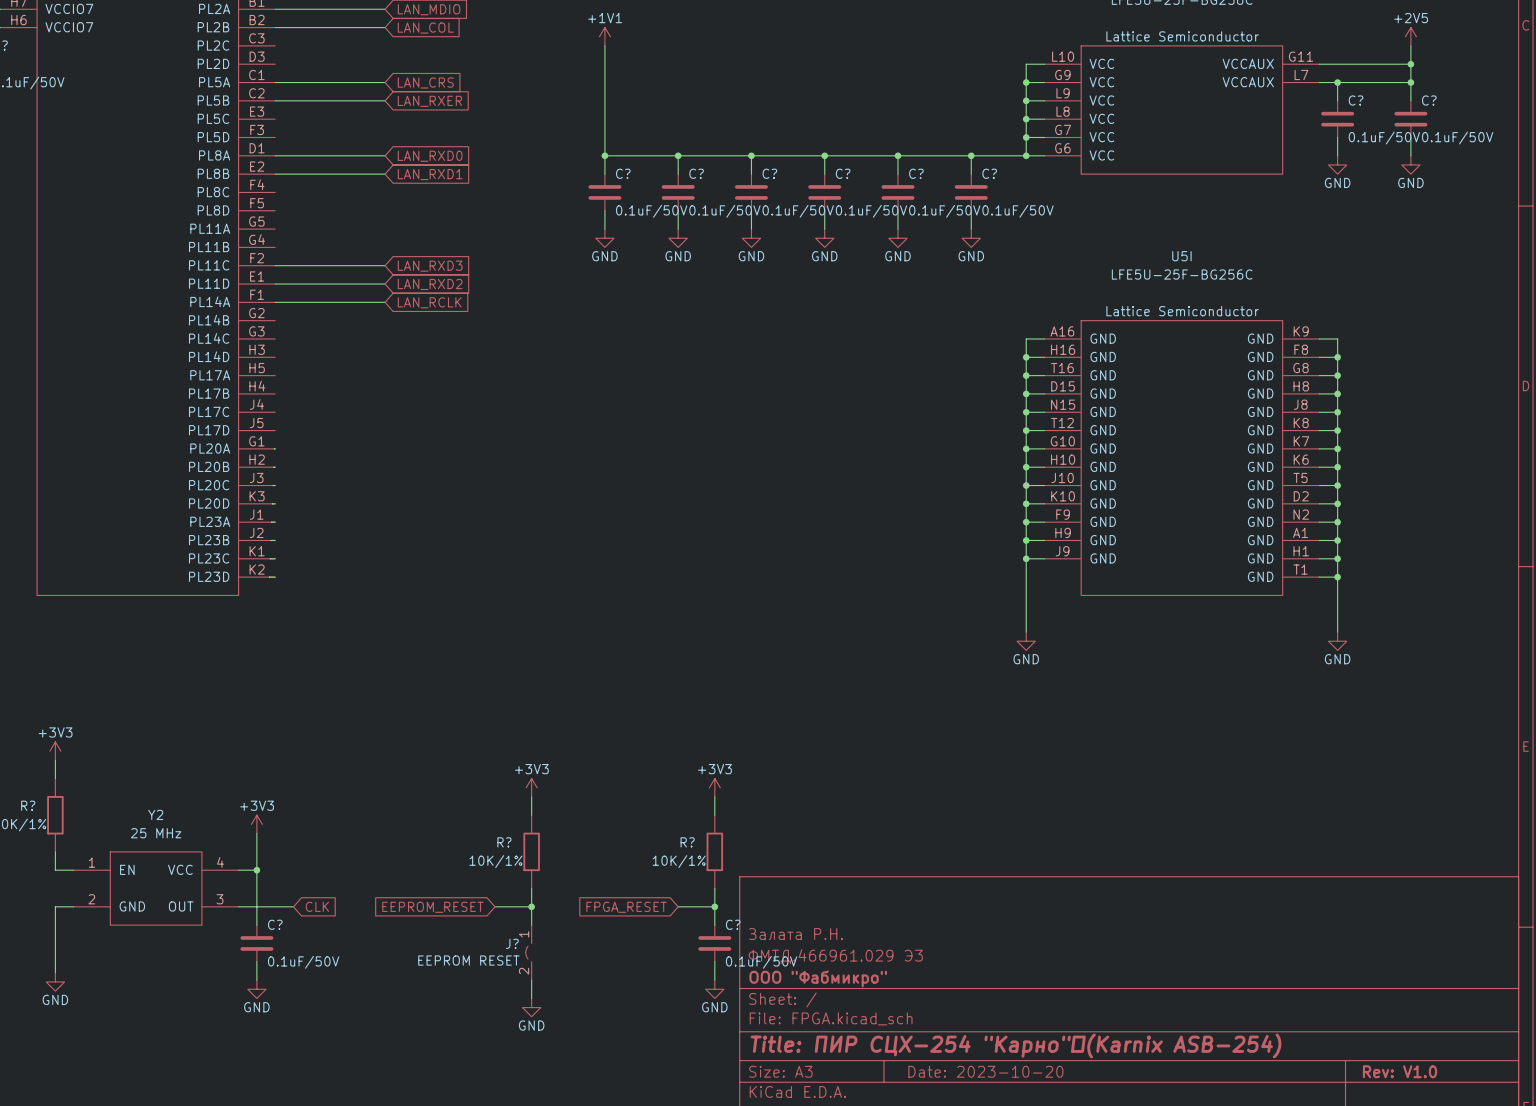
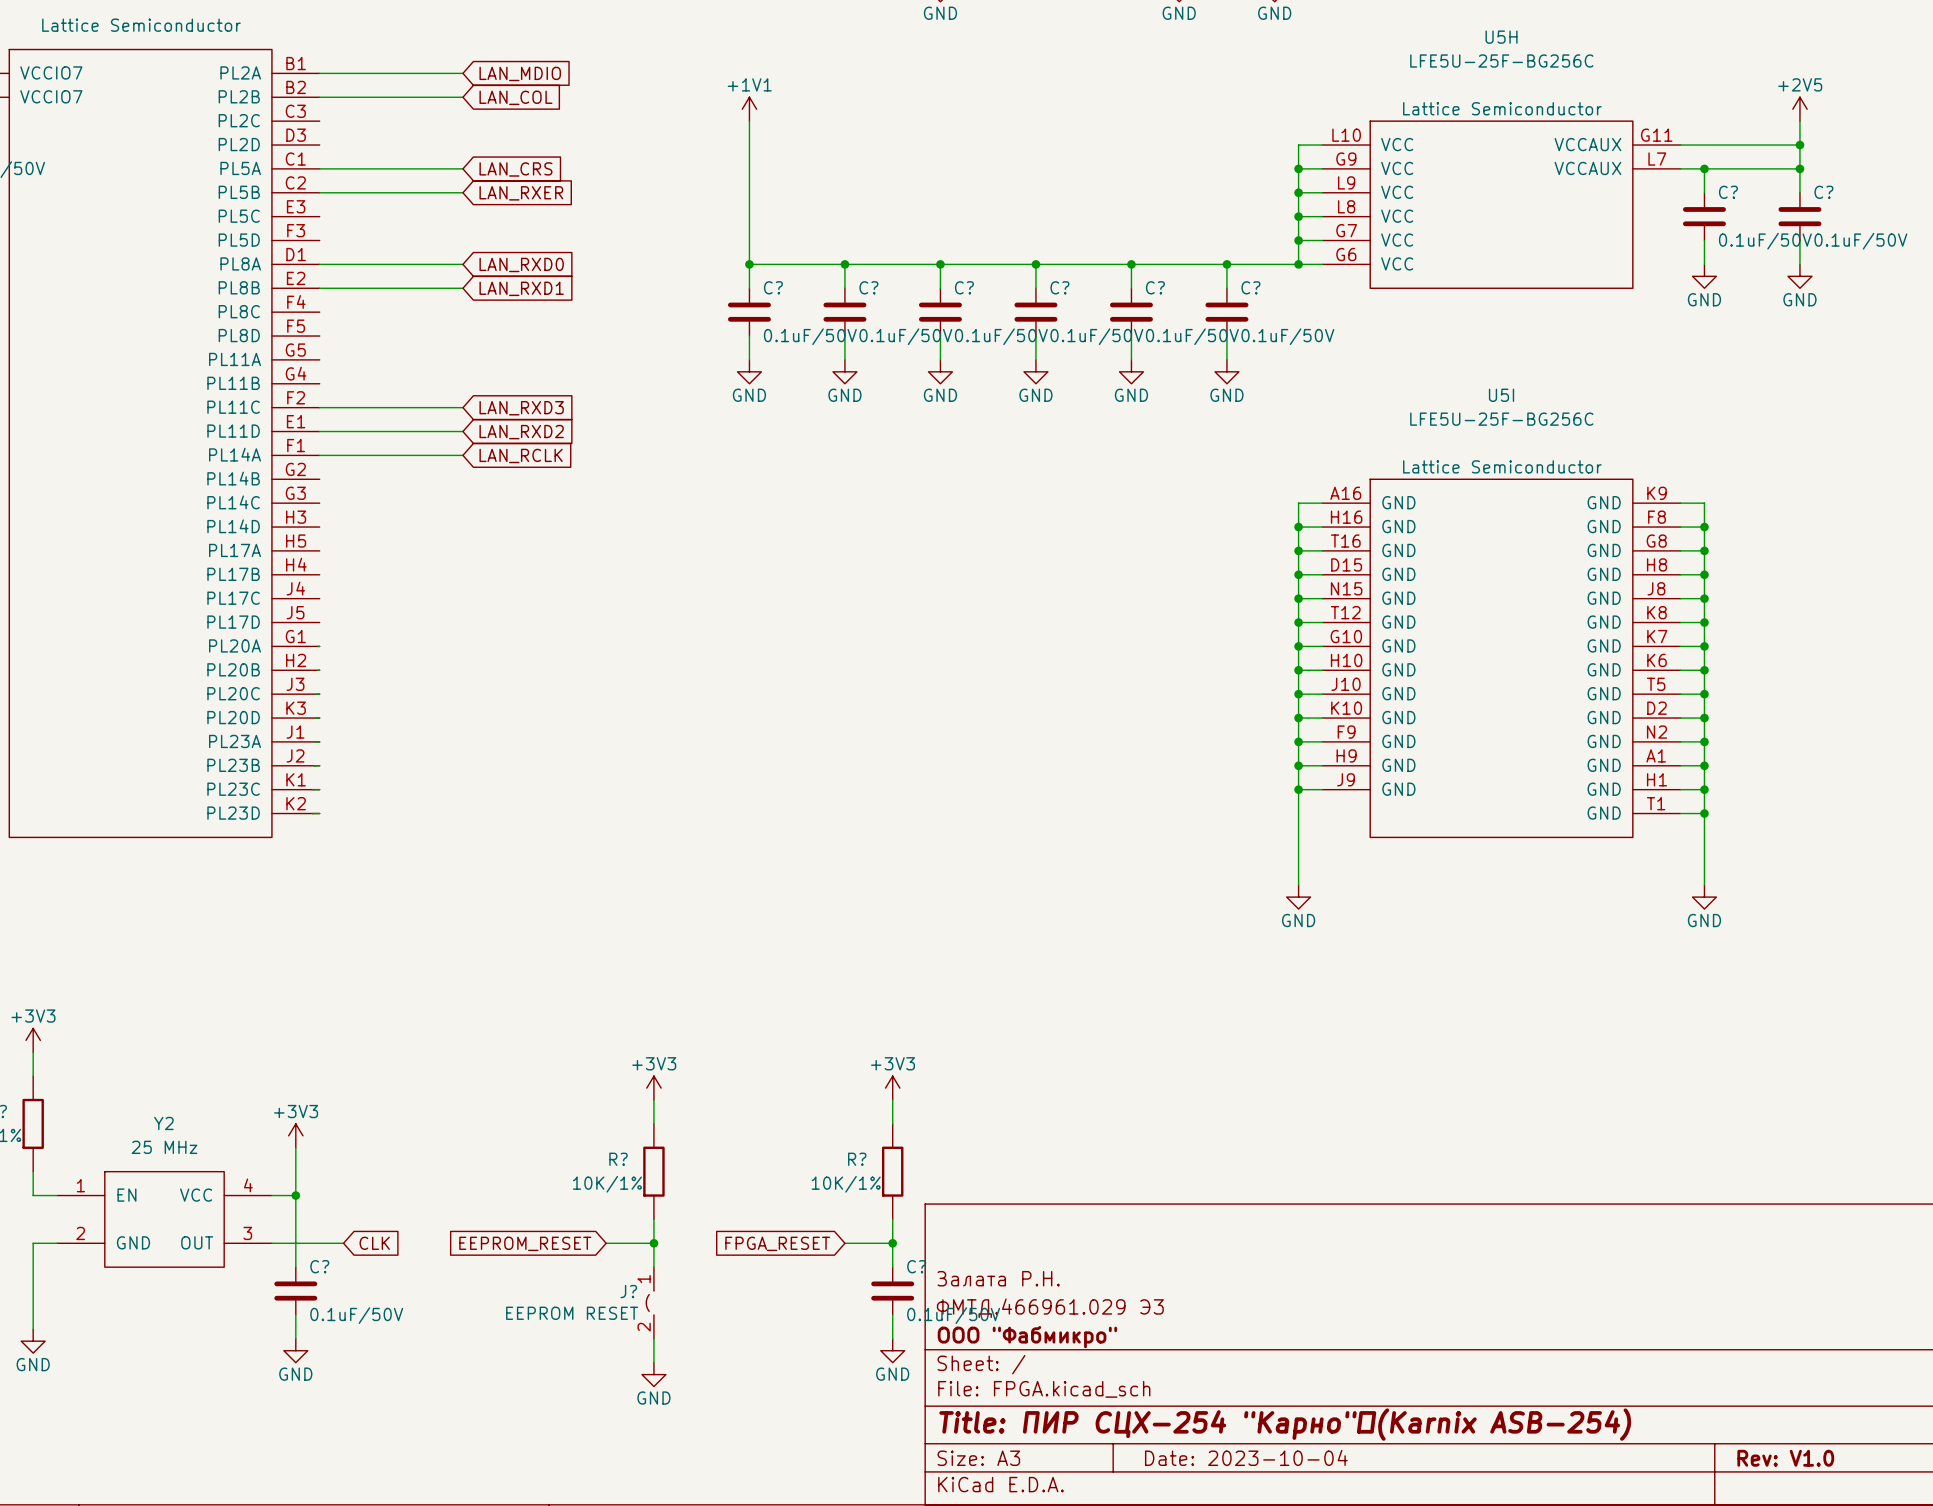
title block: Date: 2023-10-20 (985, 1071) -> Date: 2023-10-04 (1246, 1457)

